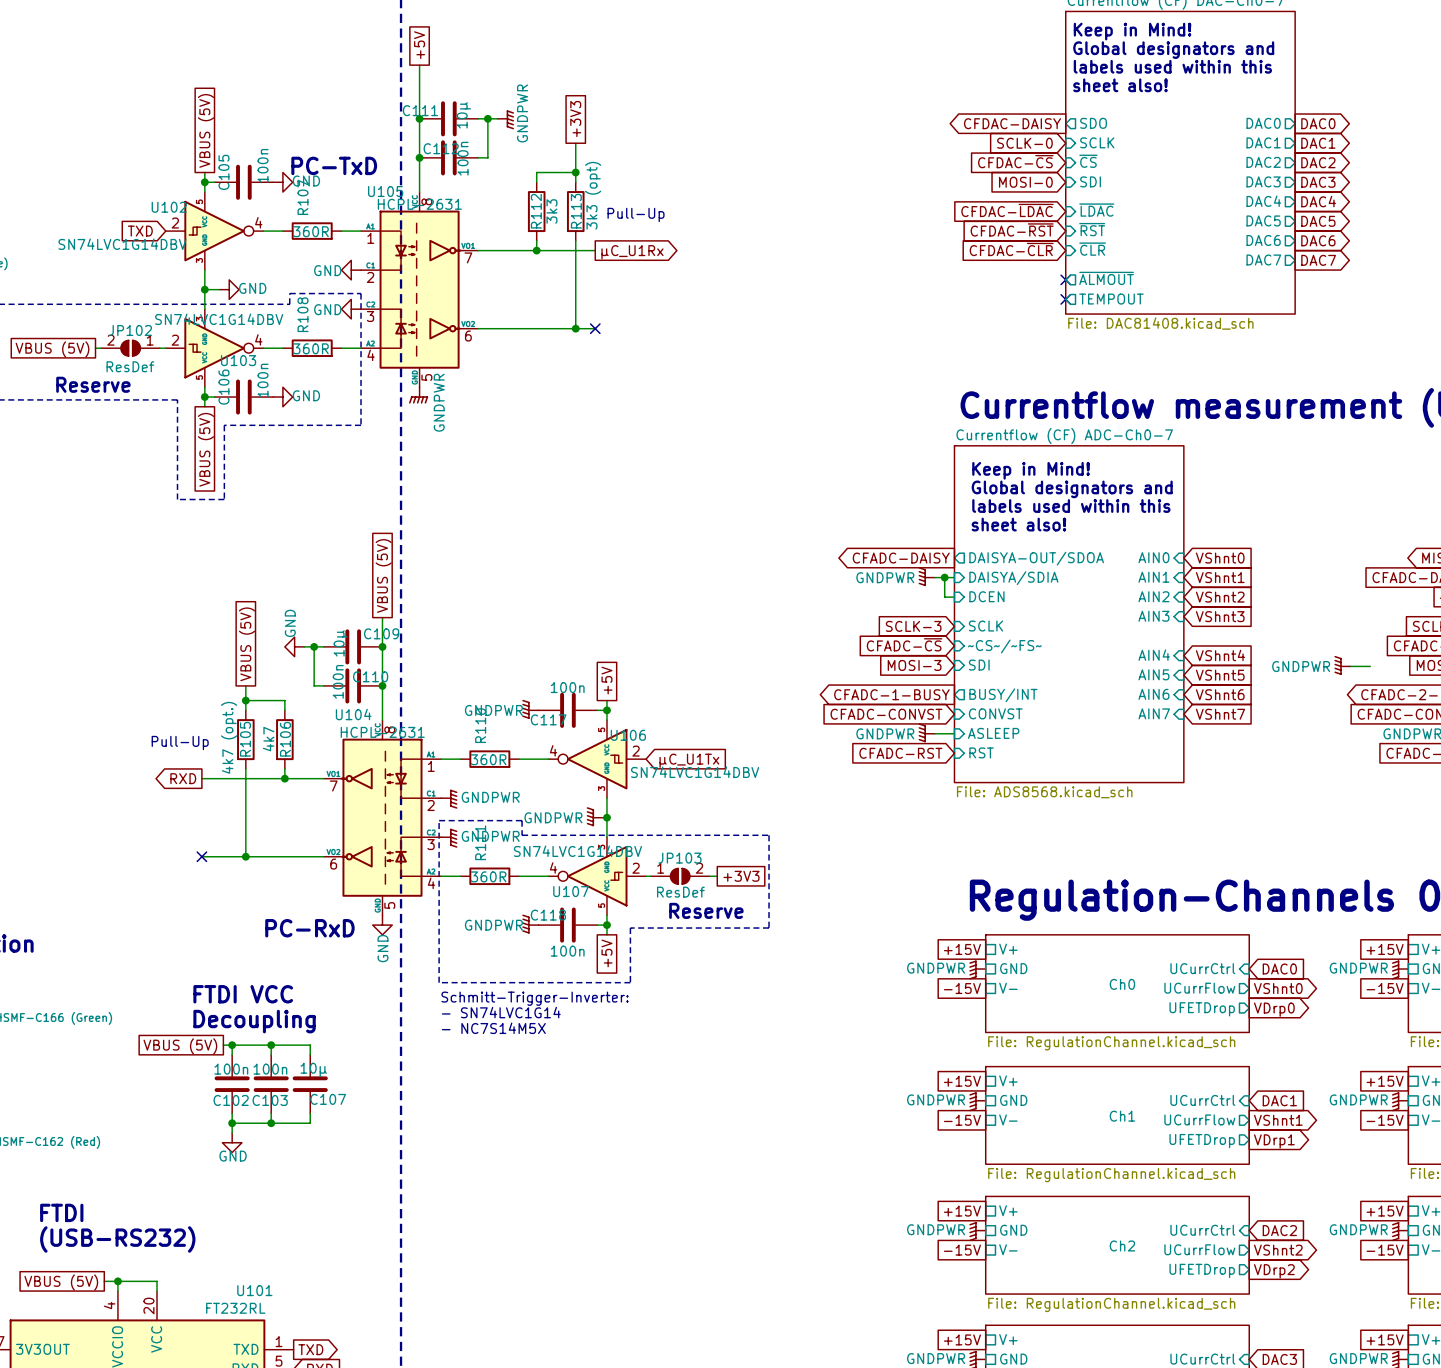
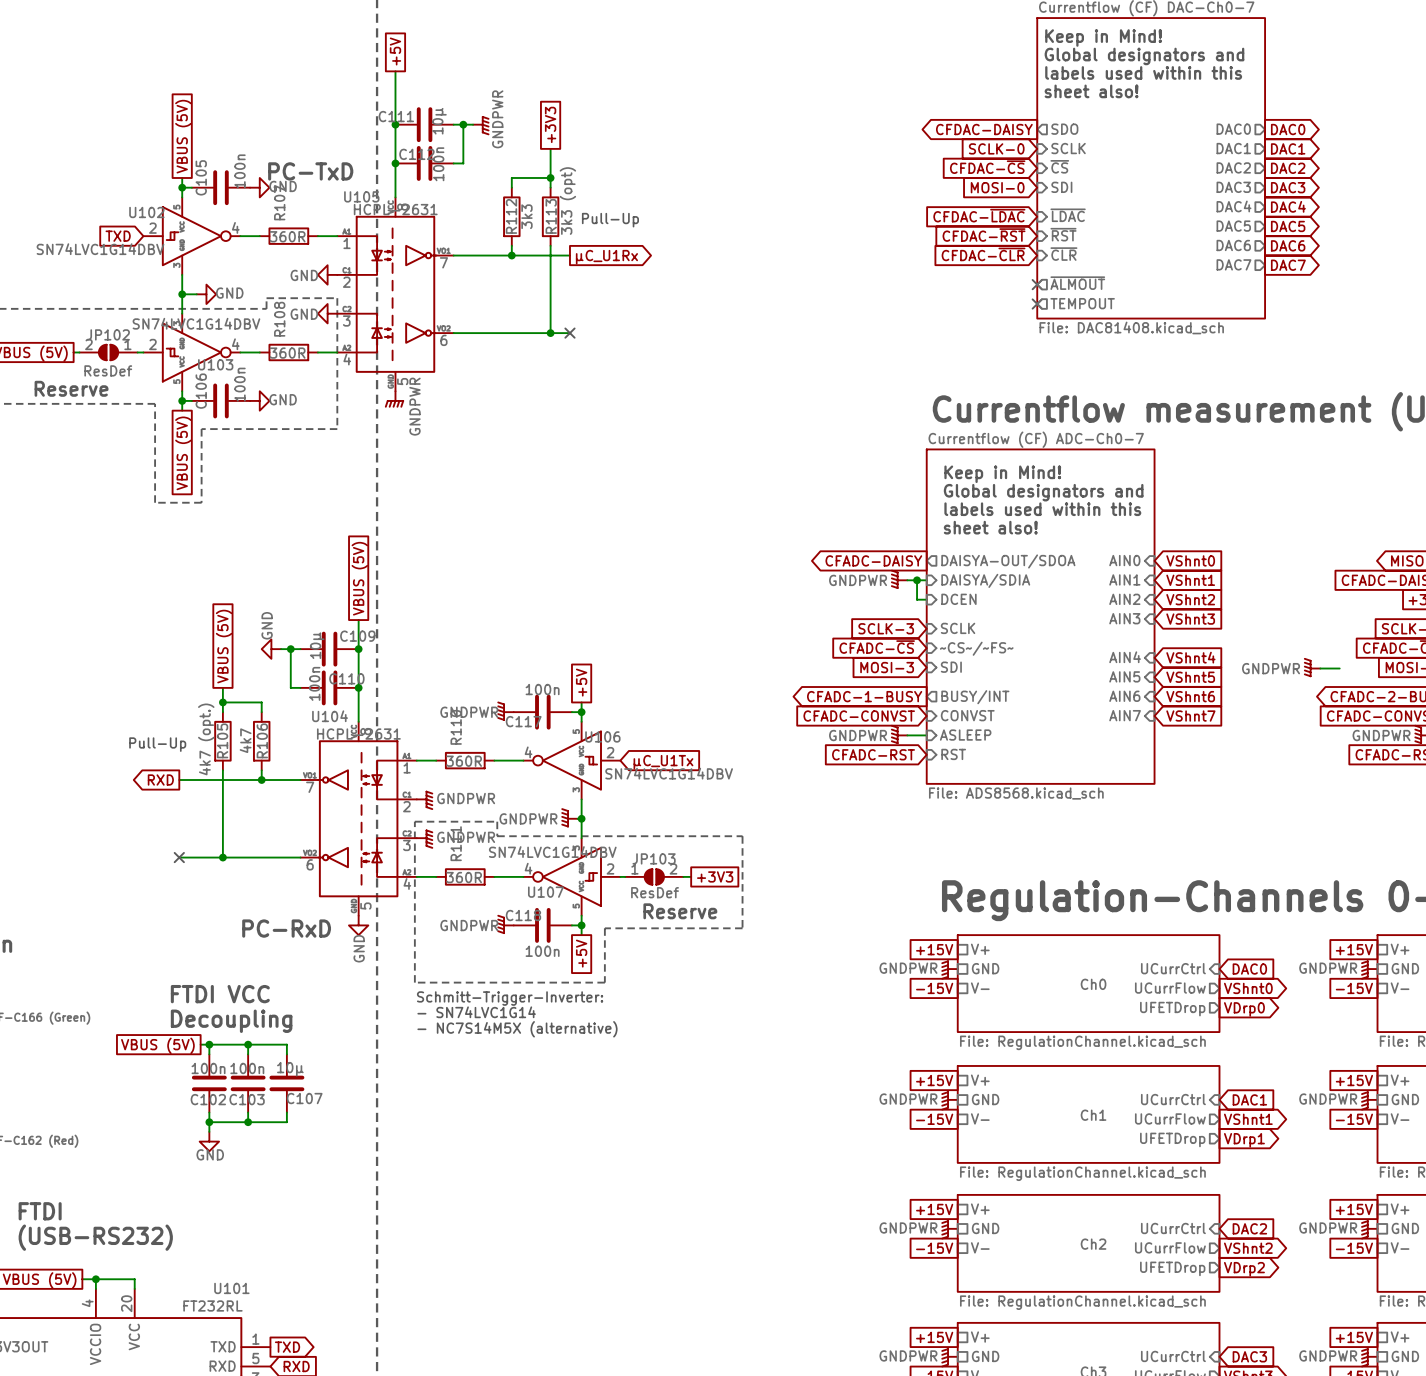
text: - NC7S14M5X (493, 1028) -> - NC7S14M5X (alternative) (517, 1029)

